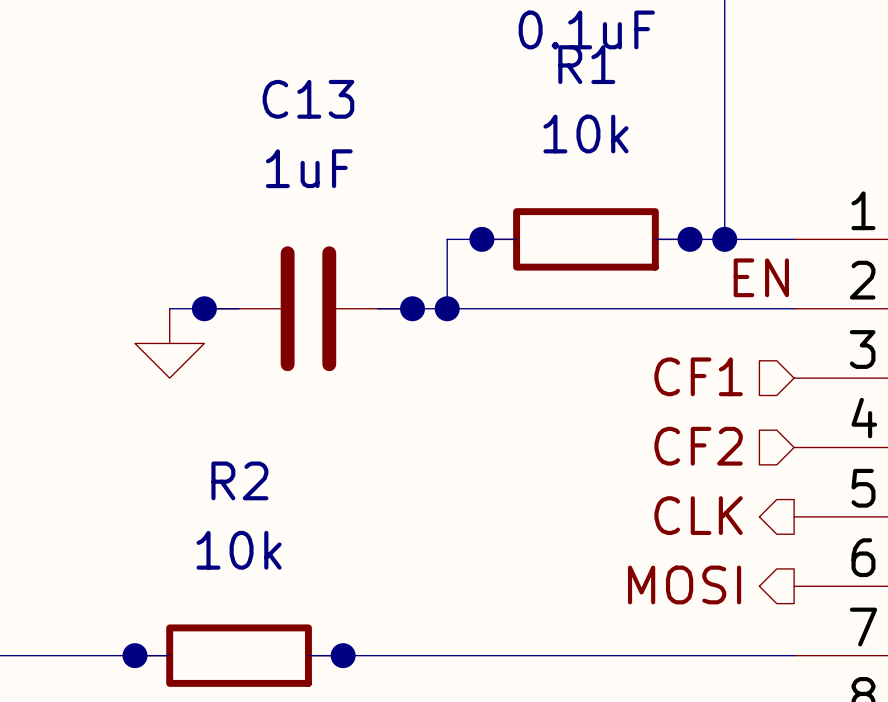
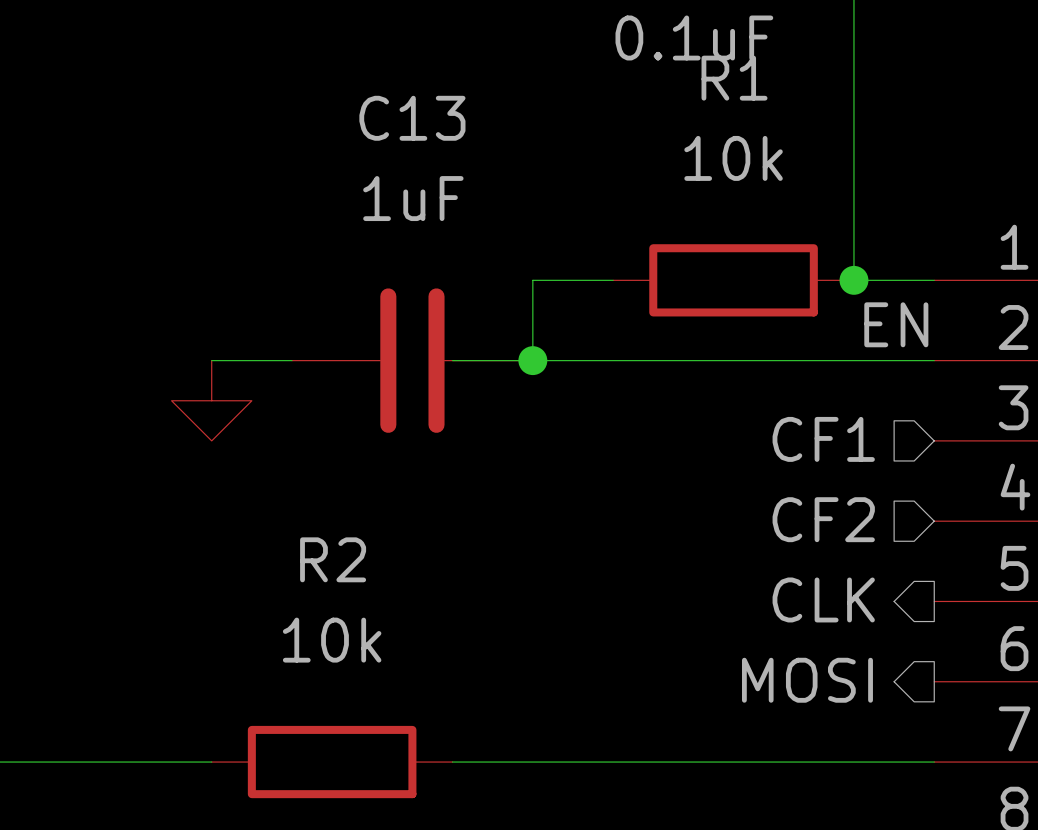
junction: (481, 239) -> none
R1 position: (585, 239) -> (733, 280)
junction: (690, 239) -> none
junction: (204, 308) -> none
C13 position: (308, 308) -> (412, 360)
junction: (412, 308) -> none
junction: (135, 655) -> none
R2 position: (239, 655) -> (332, 762)
junction: (343, 655) -> none

